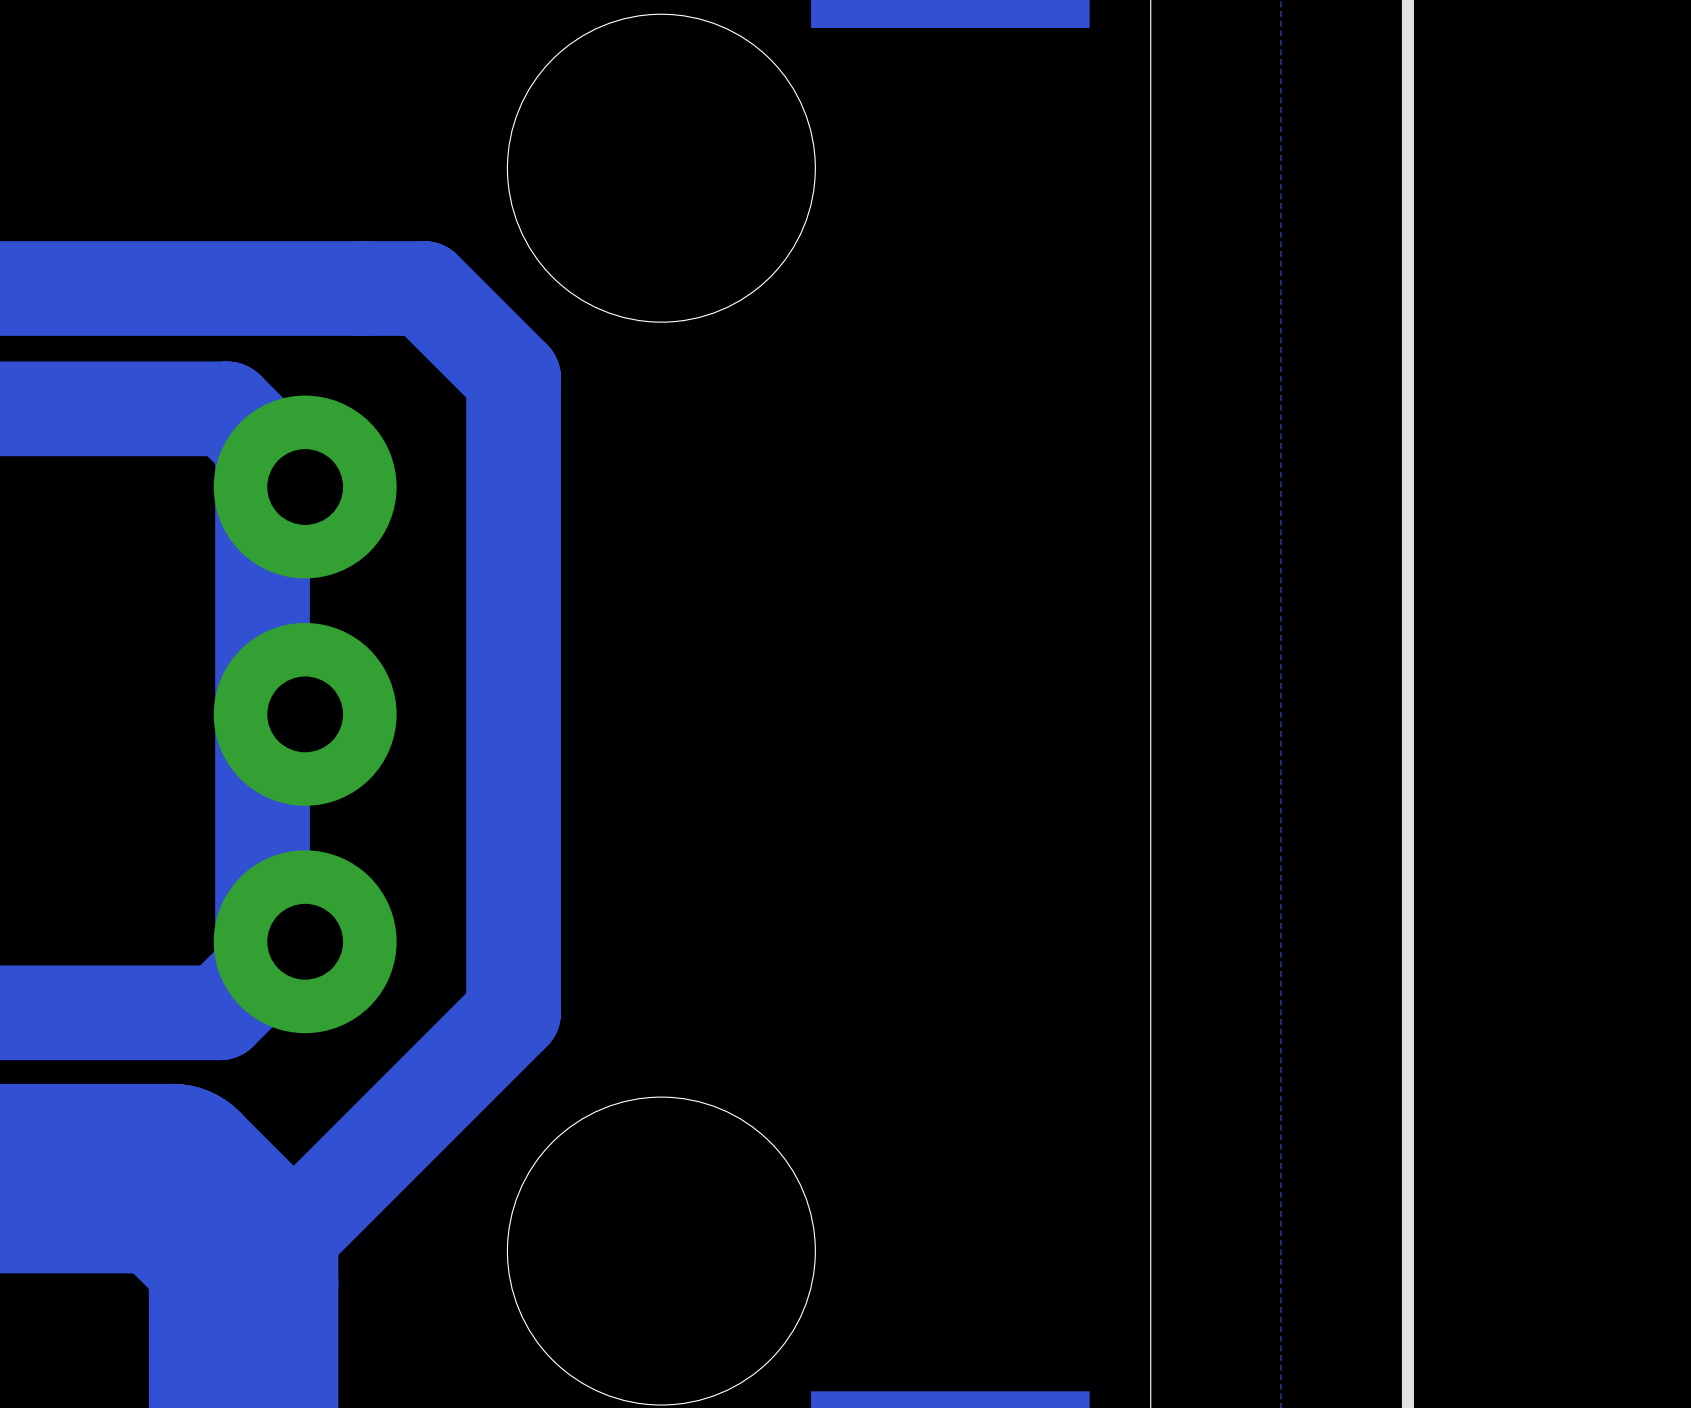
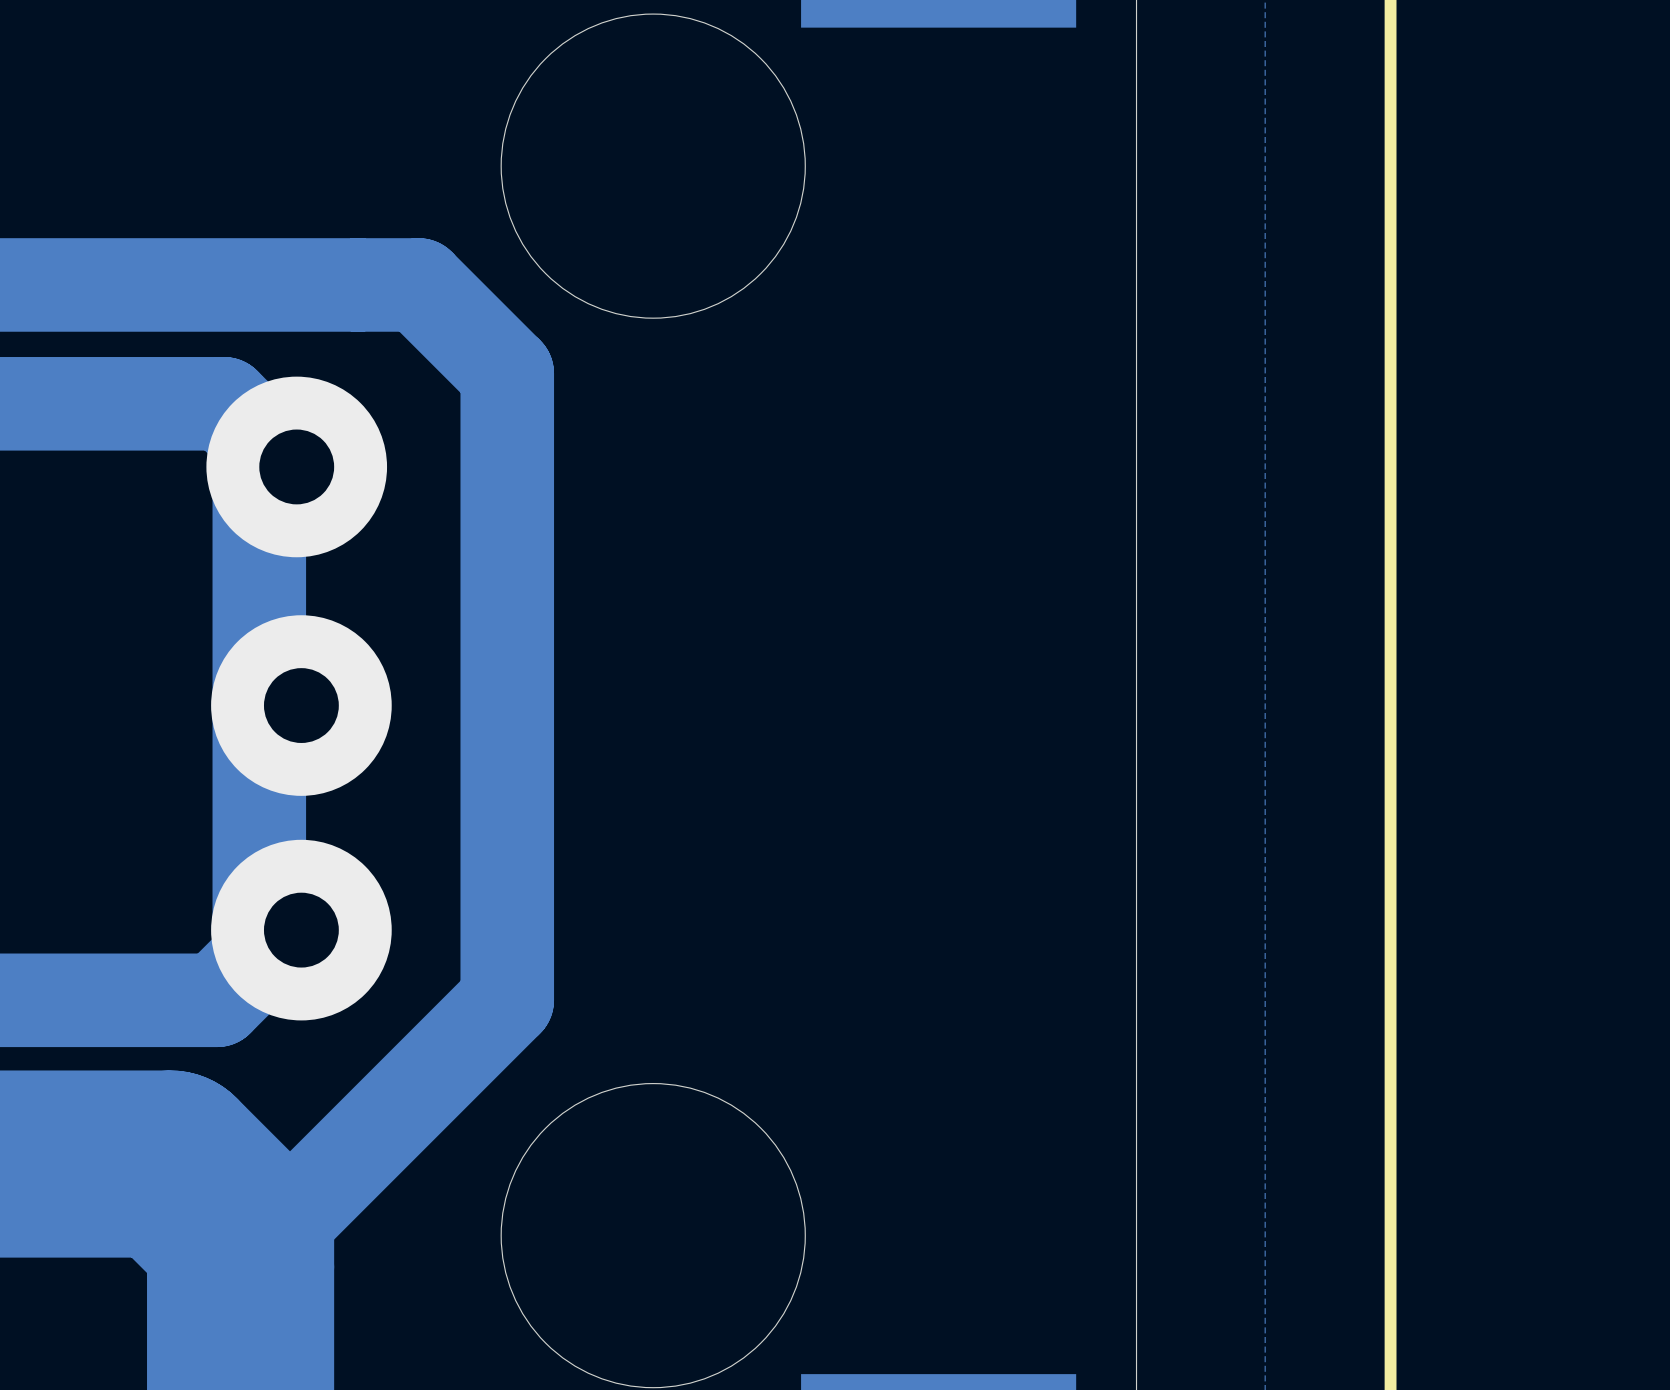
via position: (305, 487) -> (296, 466)

